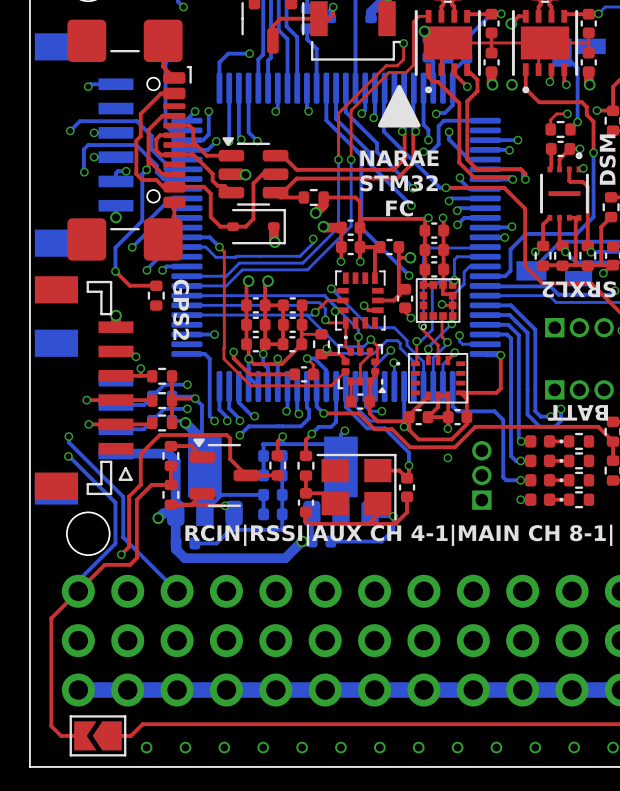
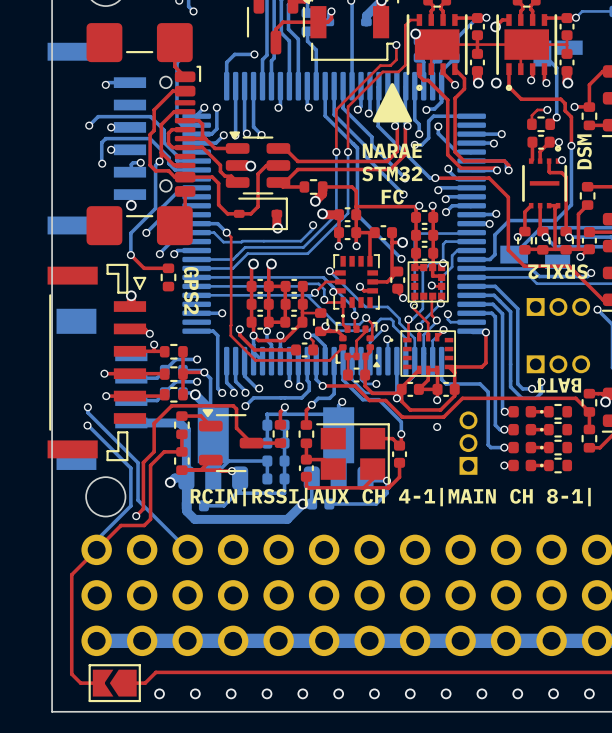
part footprint: [34, 33, 134, 257] -> [47, 42, 147, 235]
part footprint: [34, 276, 134, 500] -> [47, 263, 147, 462]

